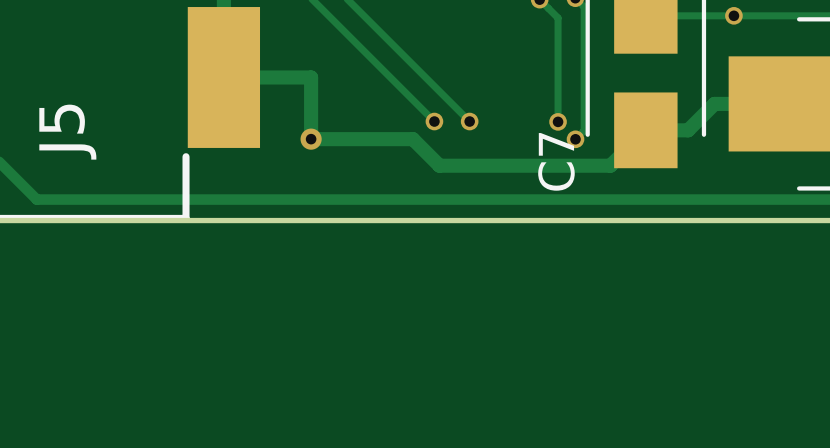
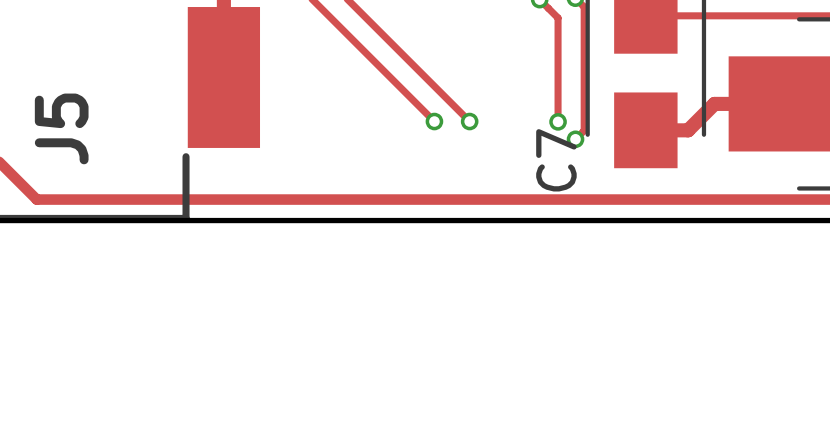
via: (733, 15) -> none
track: (223, 77) (311, 77) (311, 139) (412, 139) (439, 165) (610, 165) (645, 130) -> none
via: (311, 139) -> none

